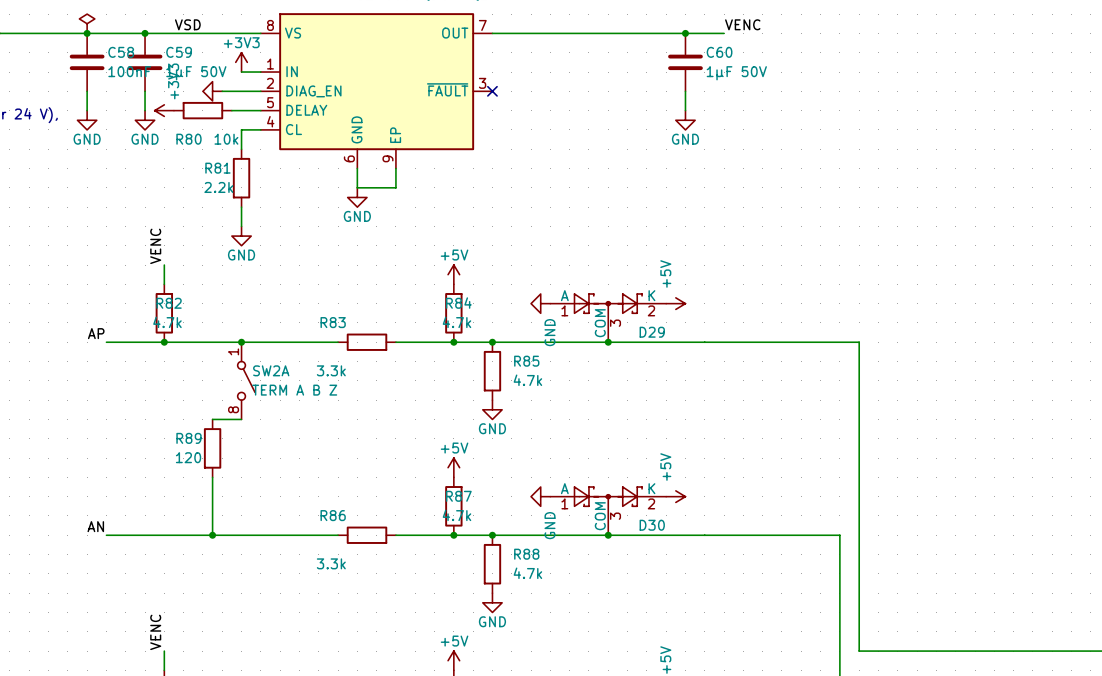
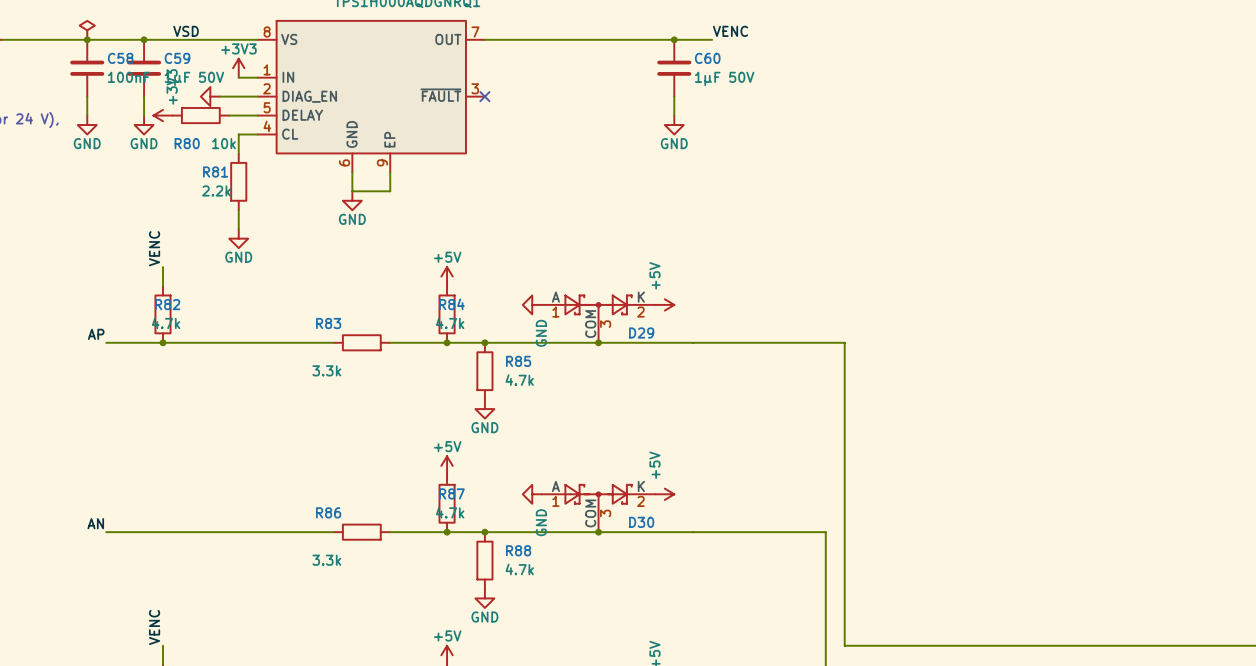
junction: (241, 342) -> none
SW2A: TERM A B Z (246, 380) -> none
wire: (212, 419) (241, 419) -> none
R89: 120 (212, 448) -> none
wire: (212, 477) (212, 535) -> none
junction: (212, 535) -> none

